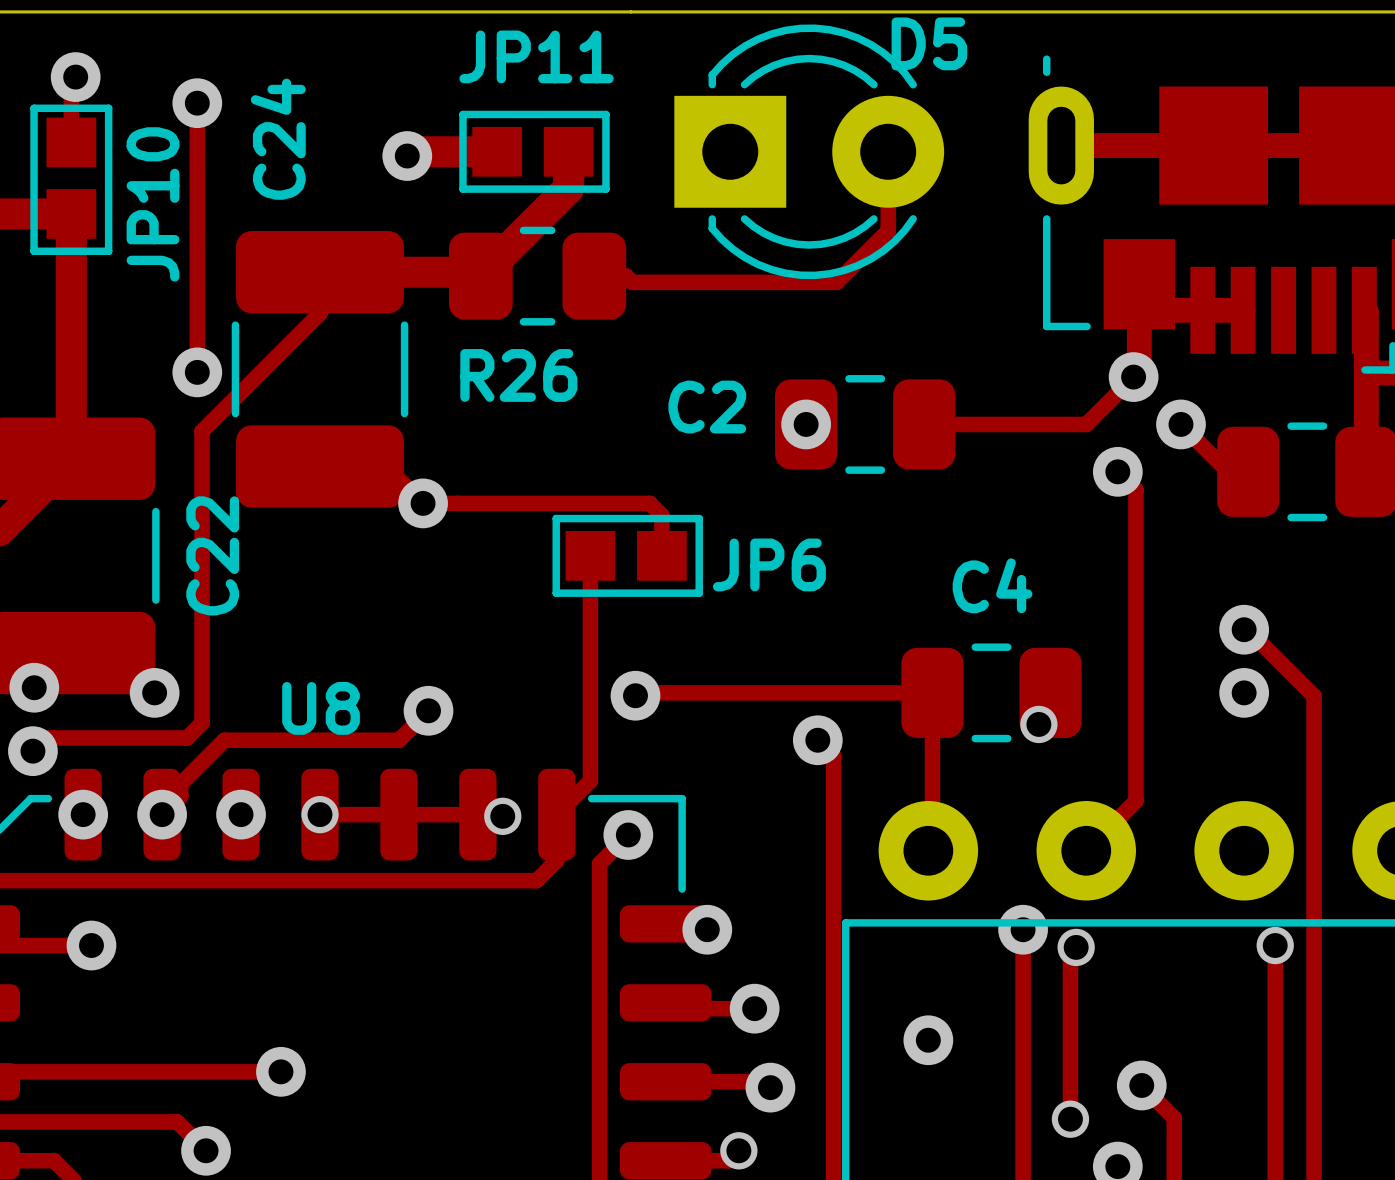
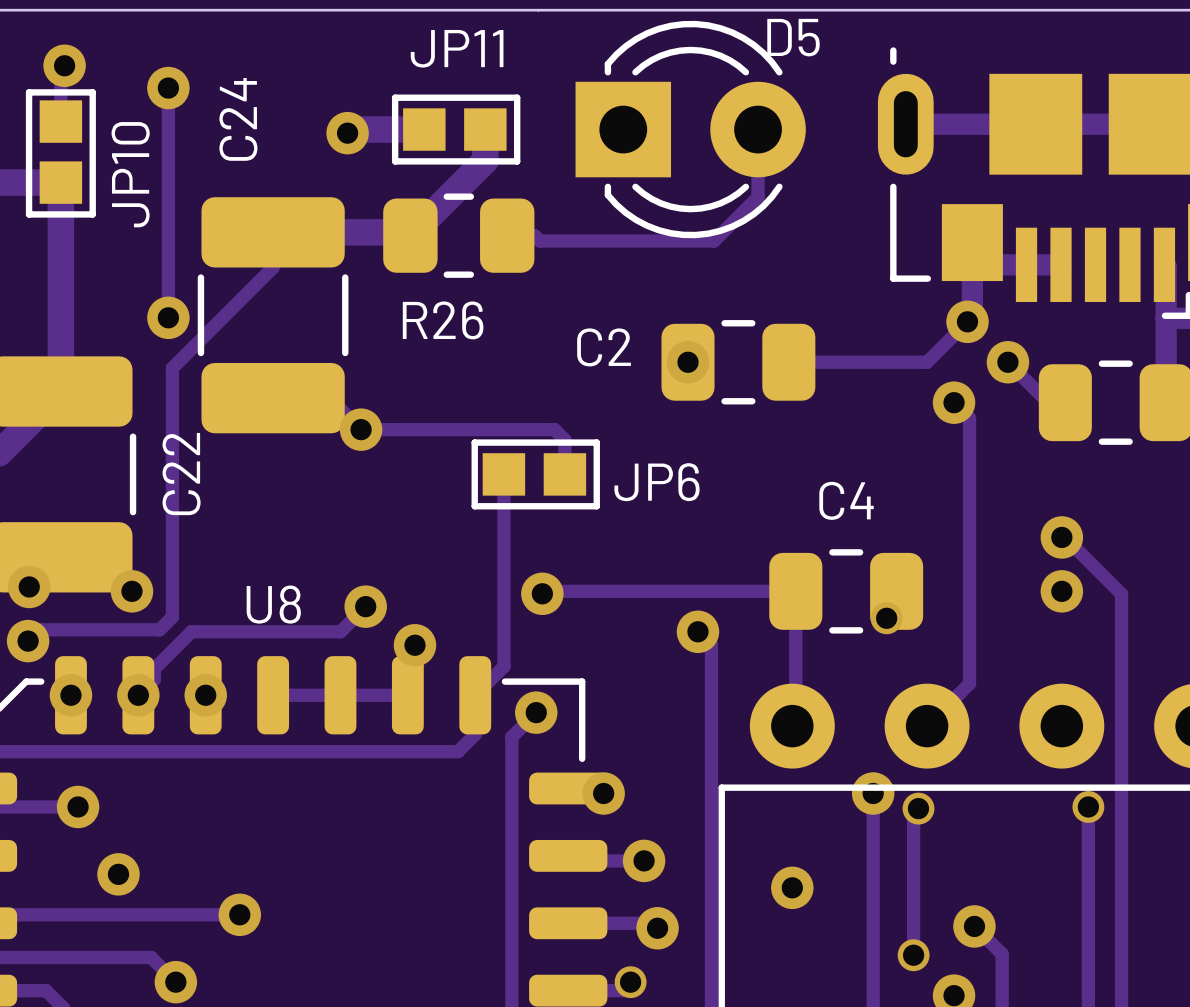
via: none -> (414, 645)
via: (320, 814) -> none
via: (502, 816) -> none
via: none -> (118, 874)

